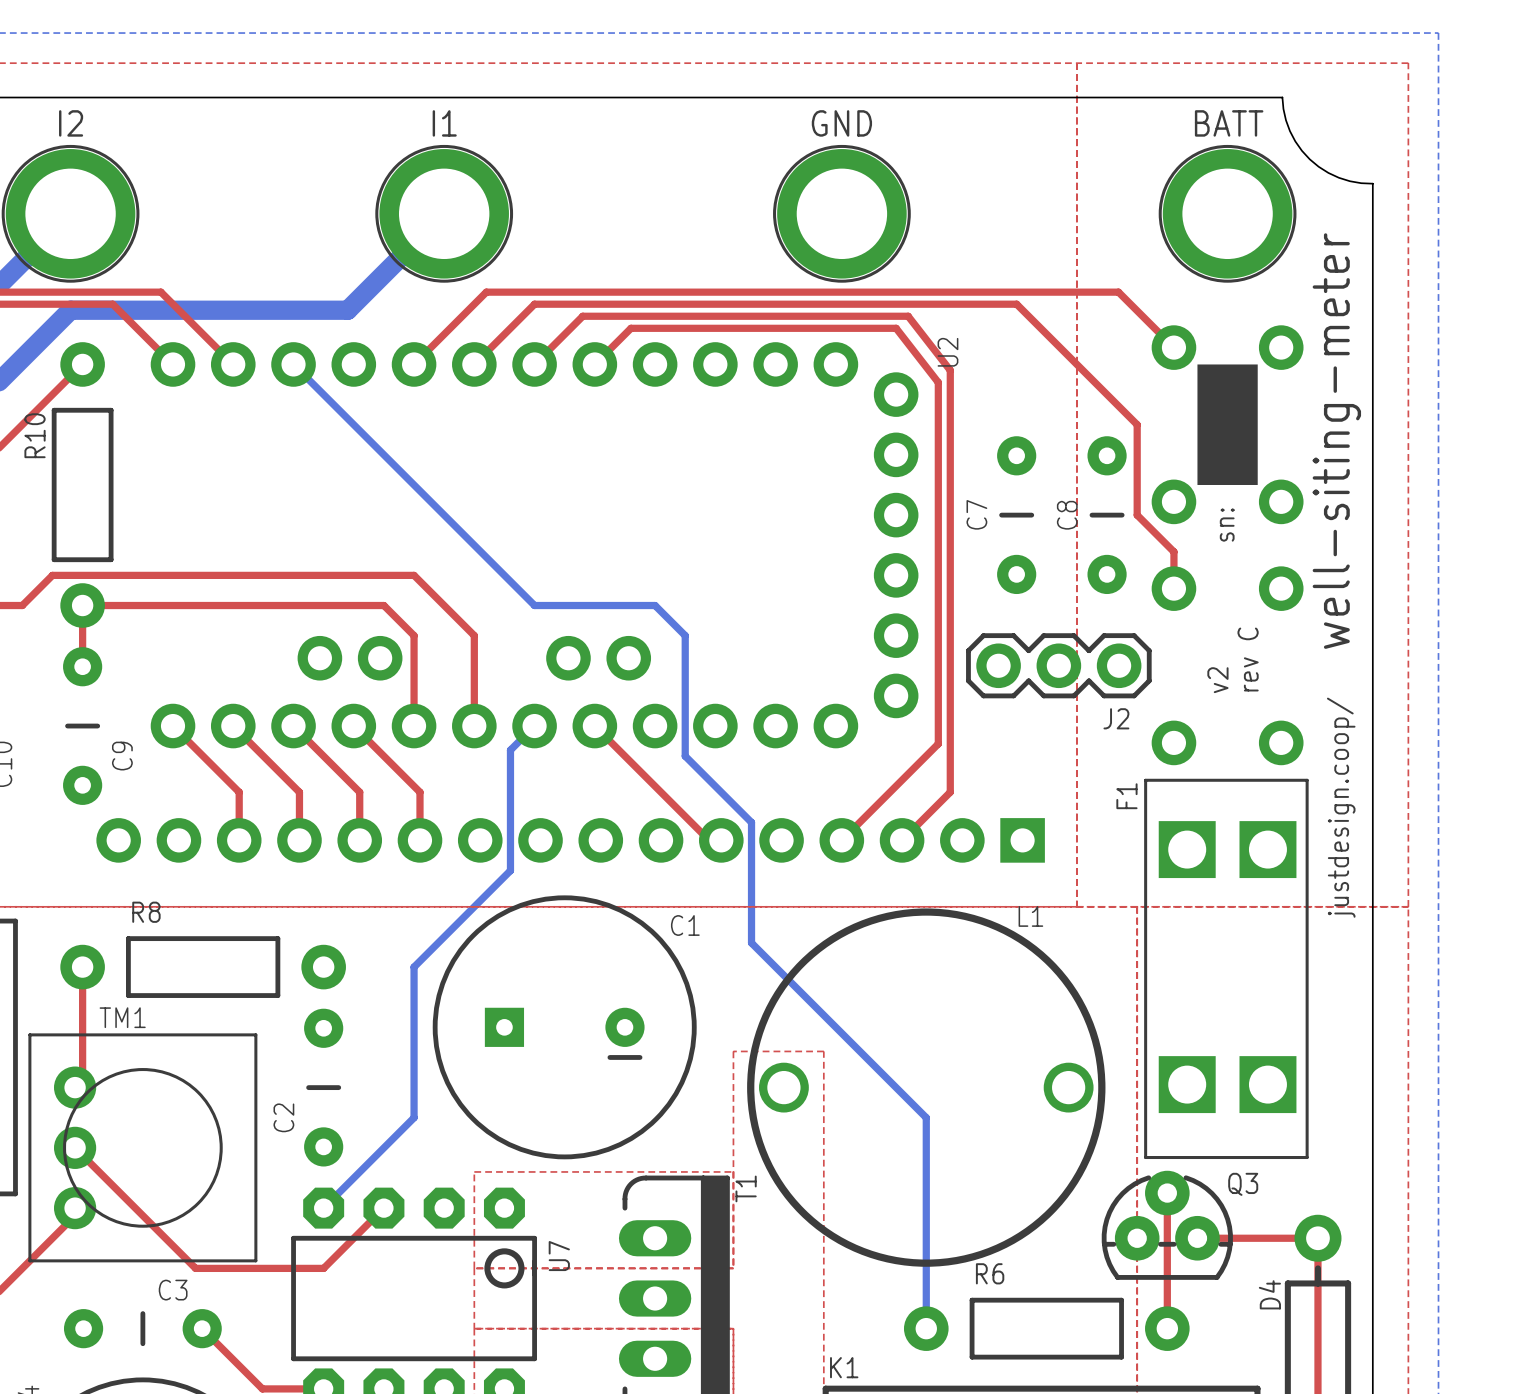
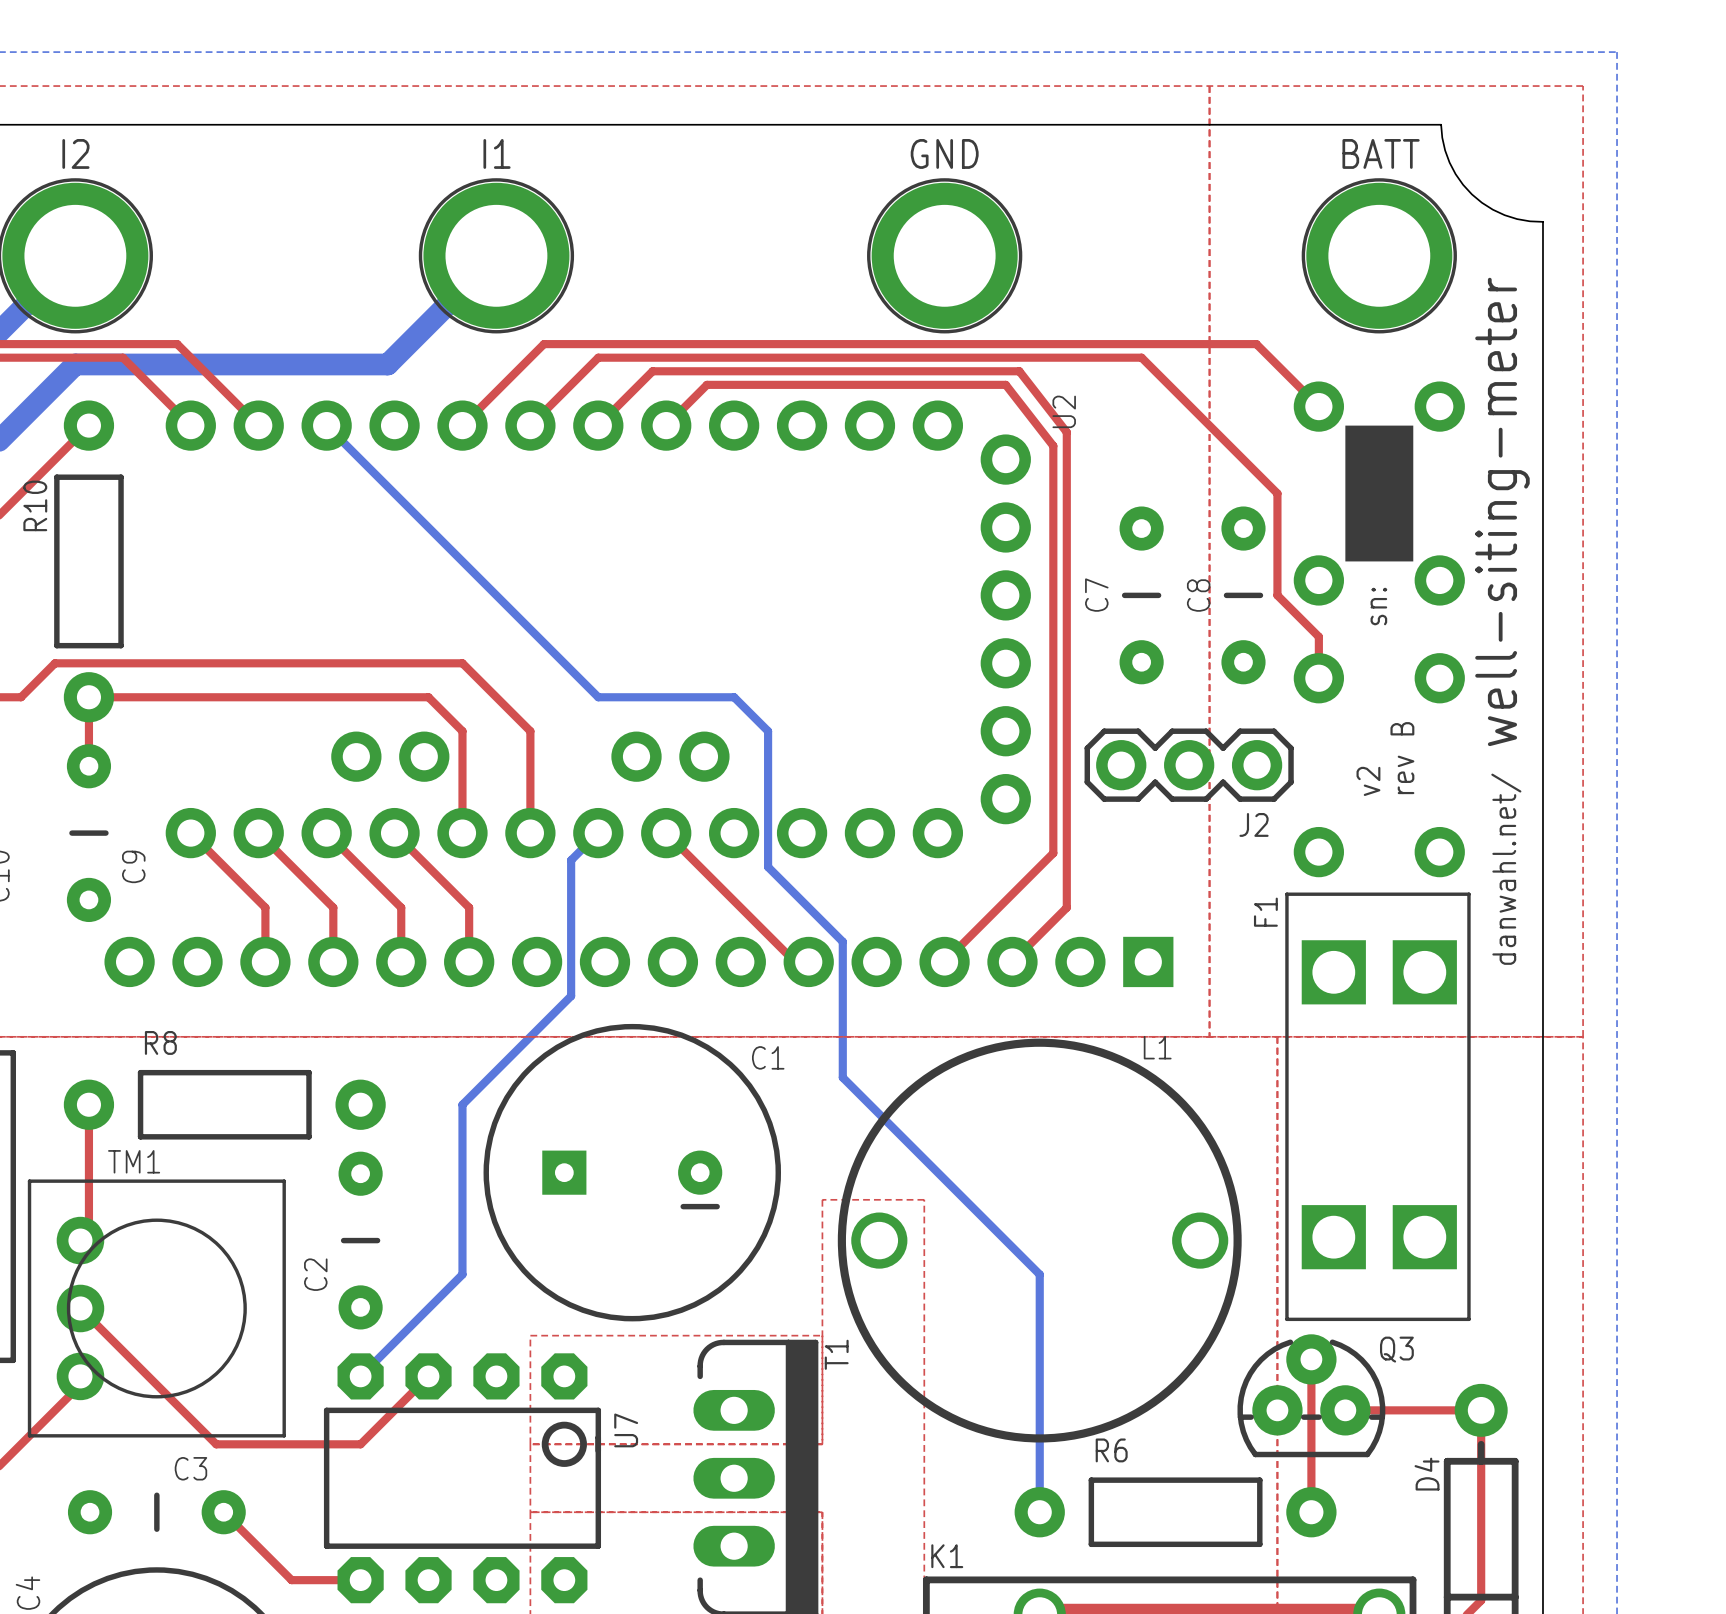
text: rev C (1248, 659) -> rev B (1402, 758)
text: none -> danwahl.net/ (1506, 869)
text: justdesign.coop/ (1341, 807) -> none

